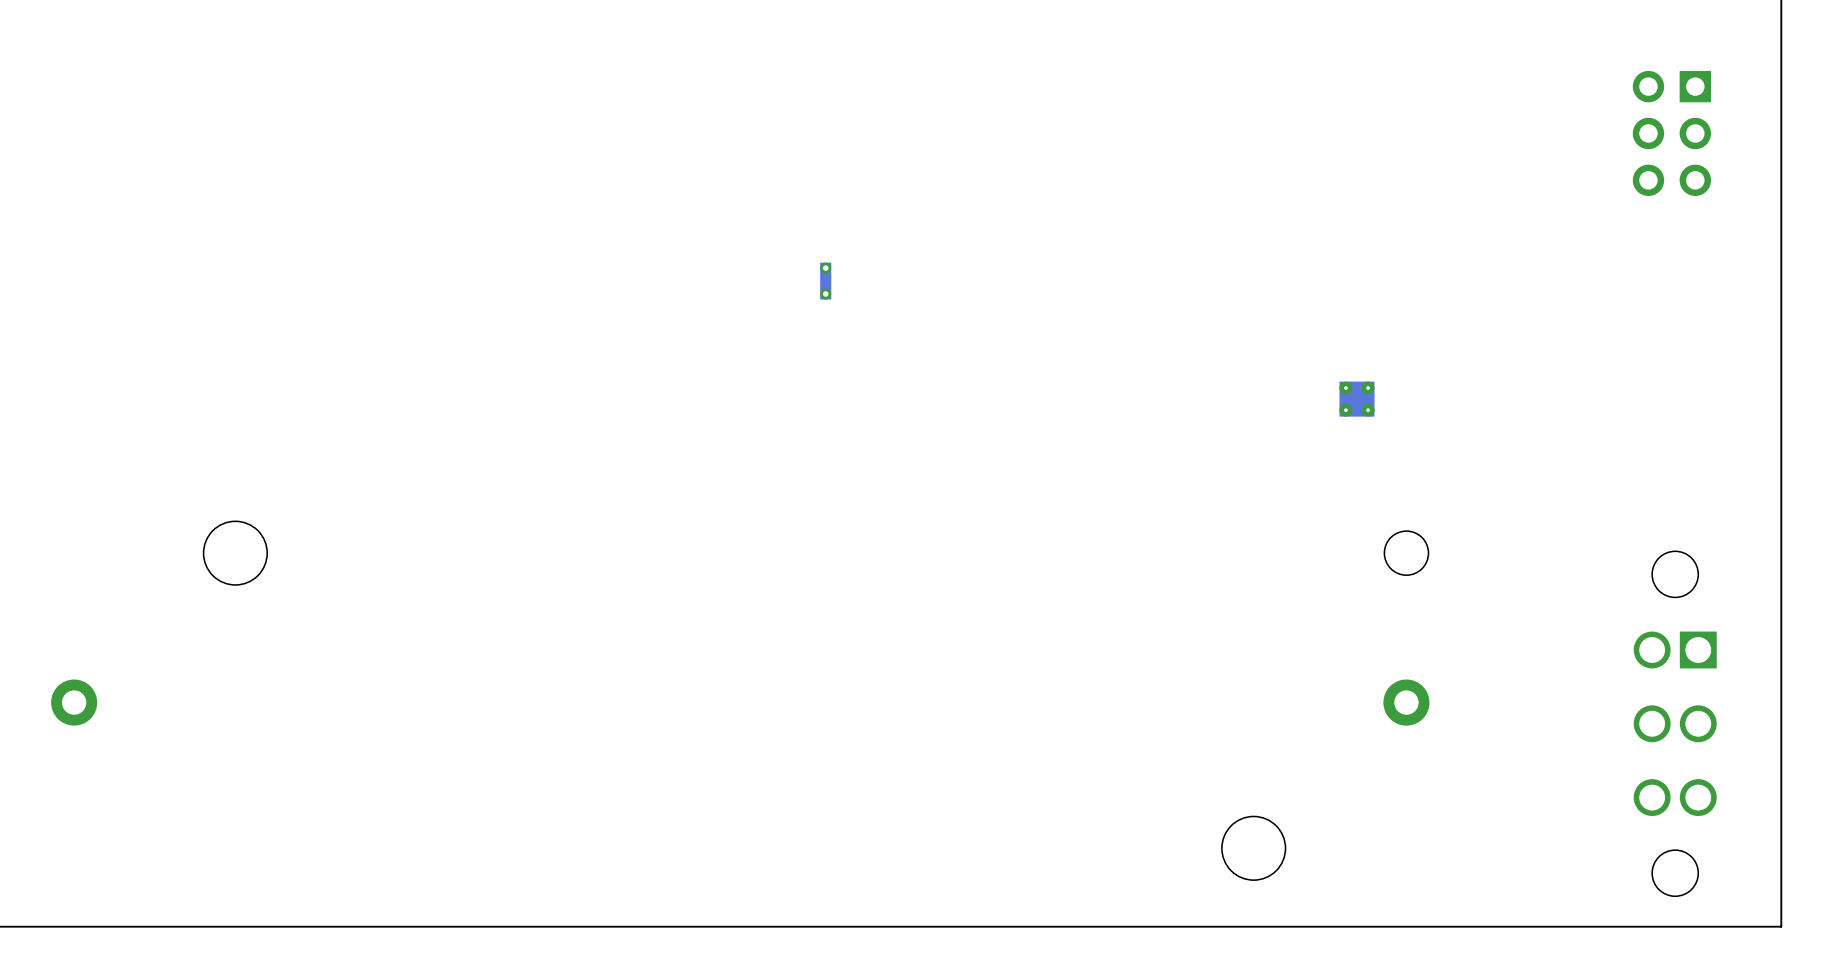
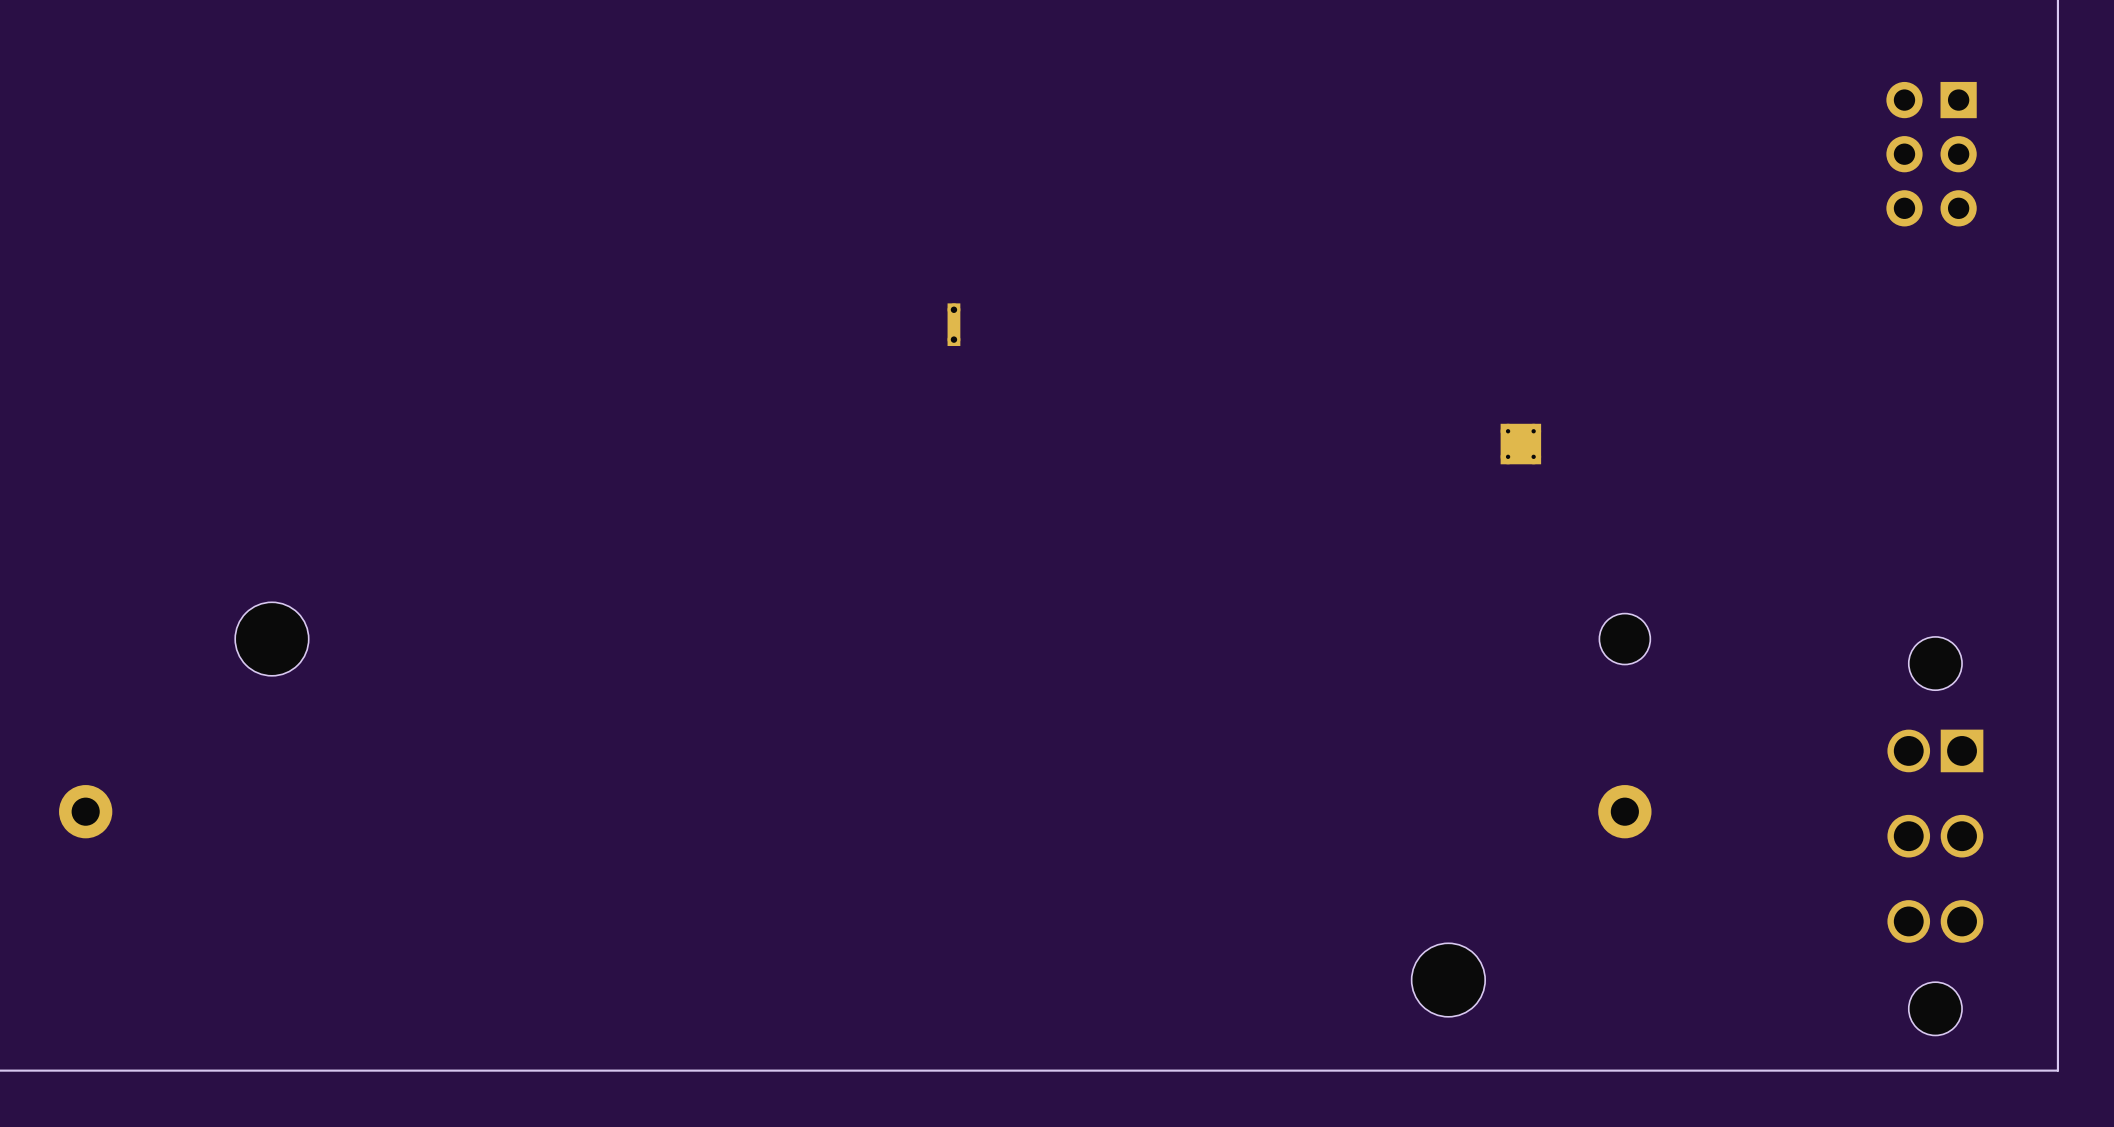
part position: (1357, 399) -> (1520, 444)

